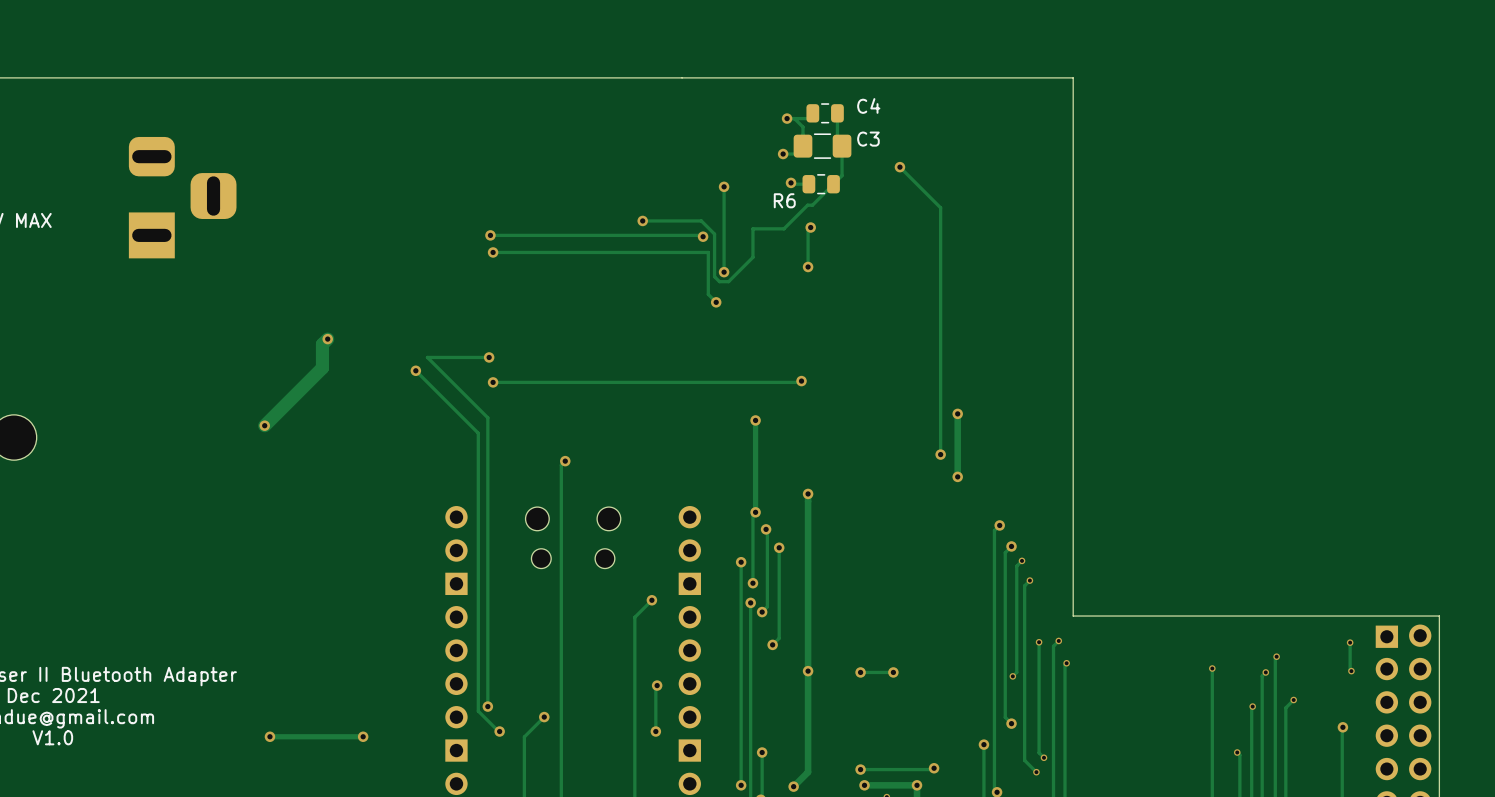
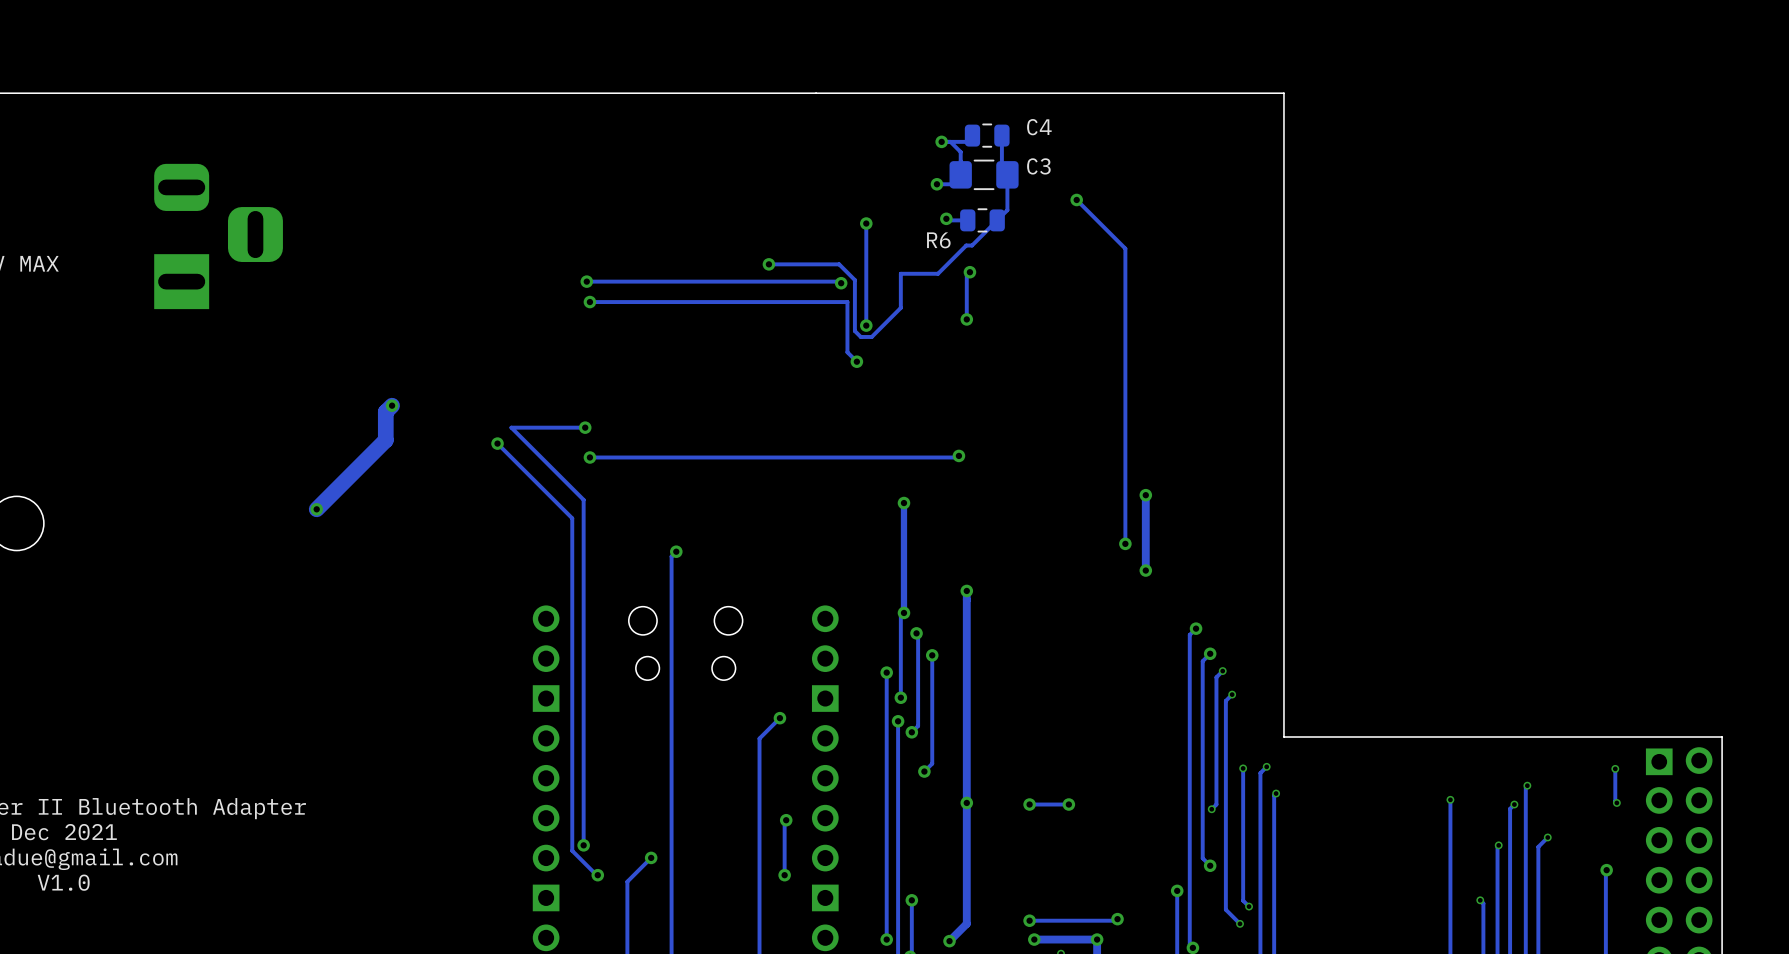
via: (269, 736) -> none
track: (363, 736) (269, 736) -> none
via: (363, 736) -> none

